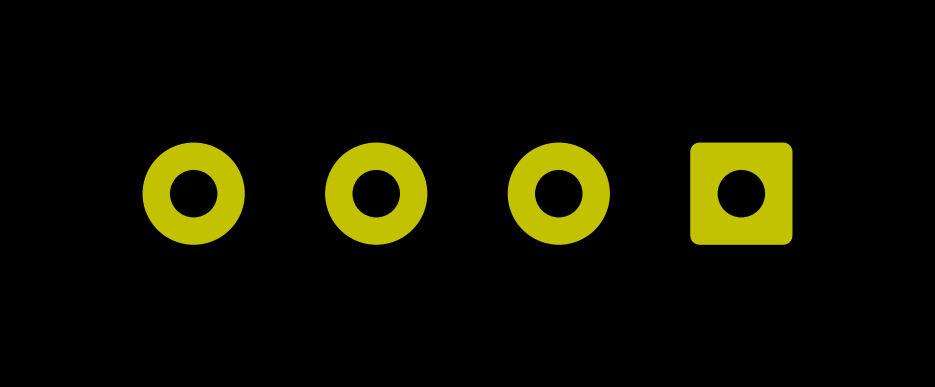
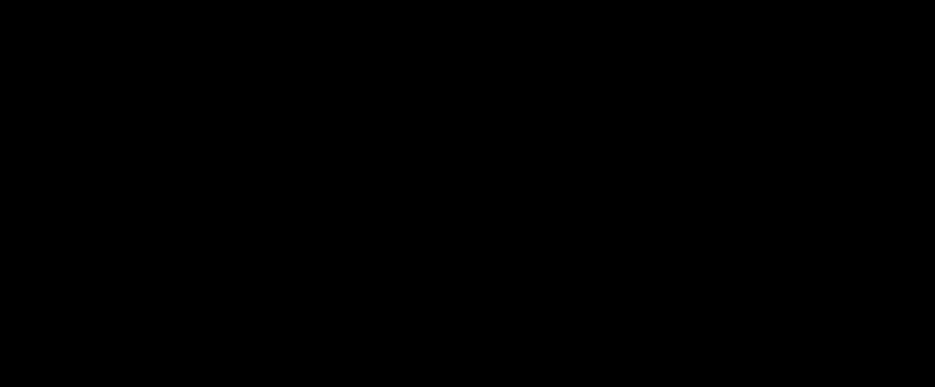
part: (467, 193) -> none

